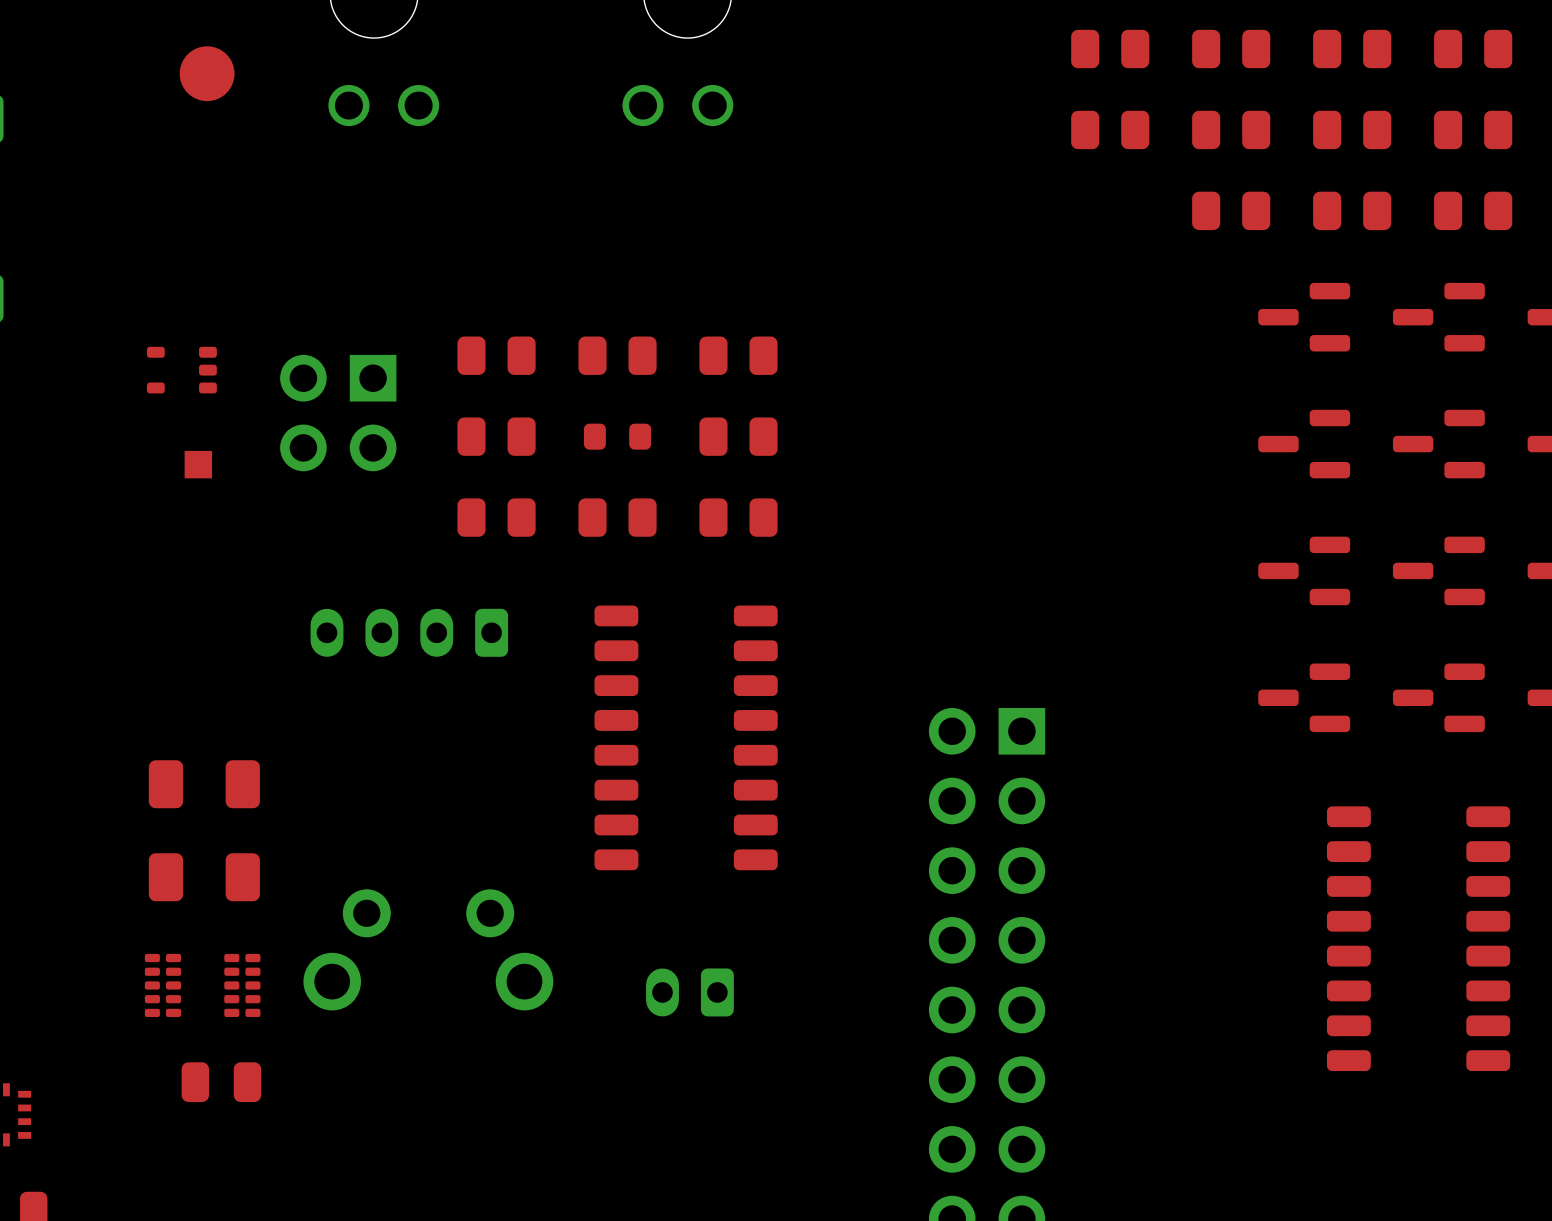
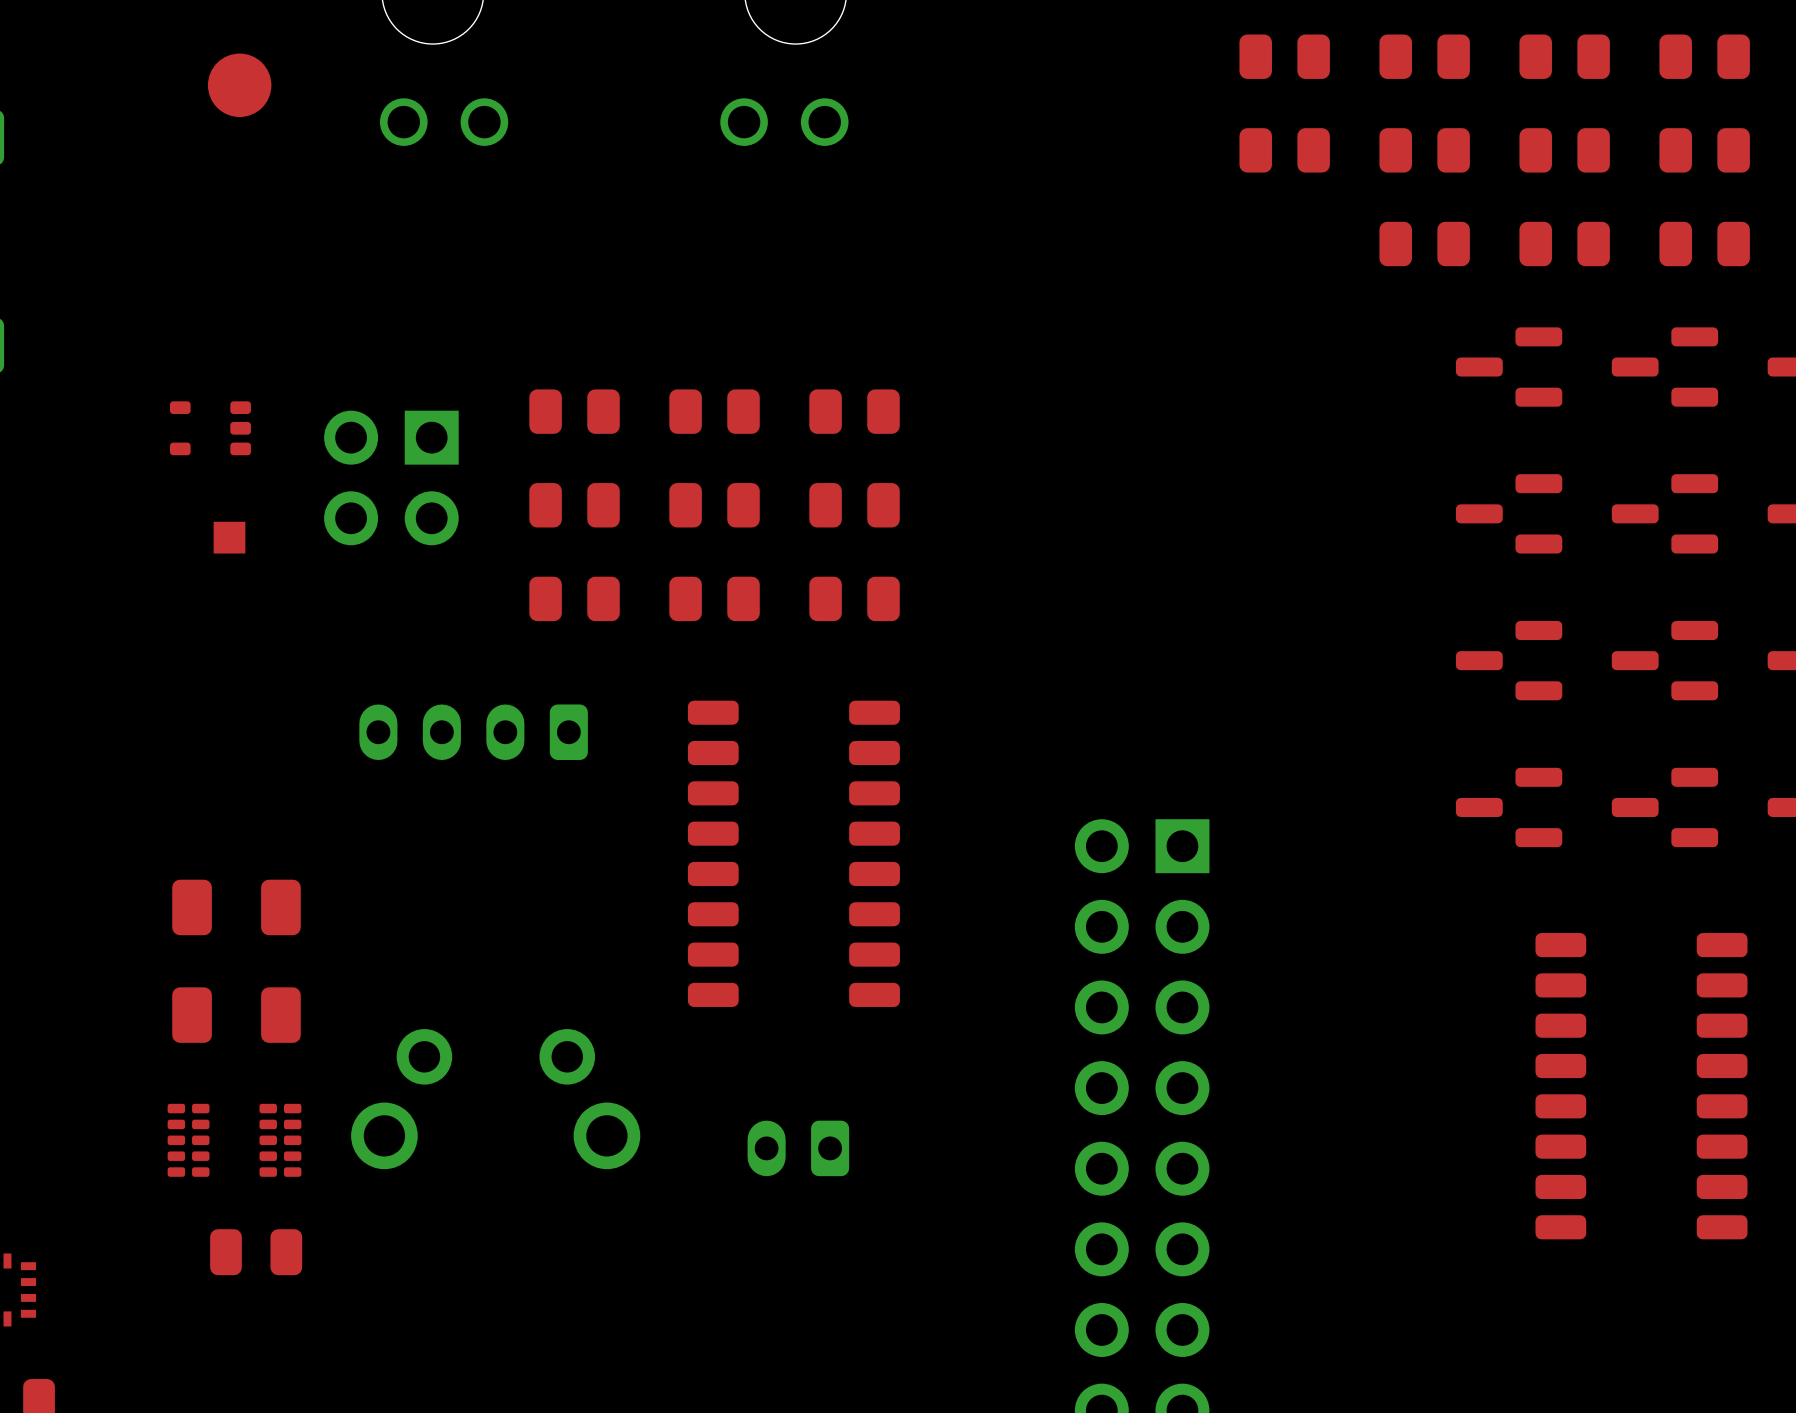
part footprint: [583, 423, 652, 450] -> [669, 483, 760, 528]

